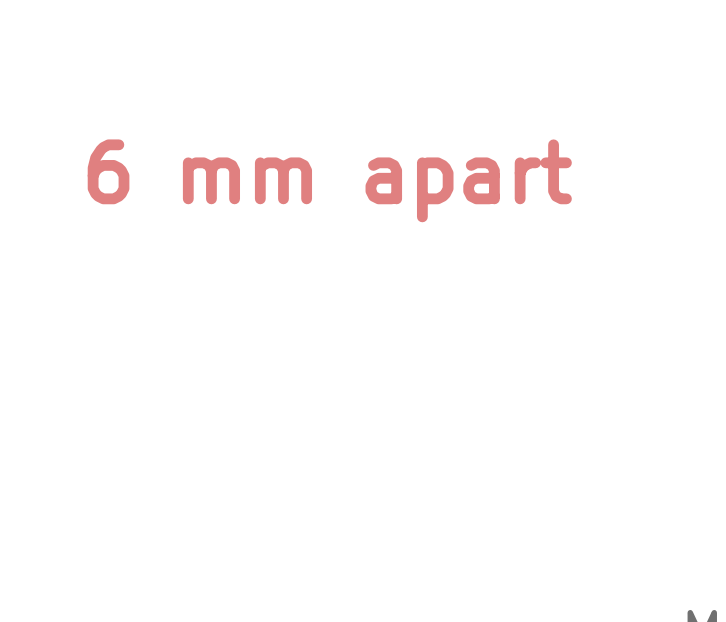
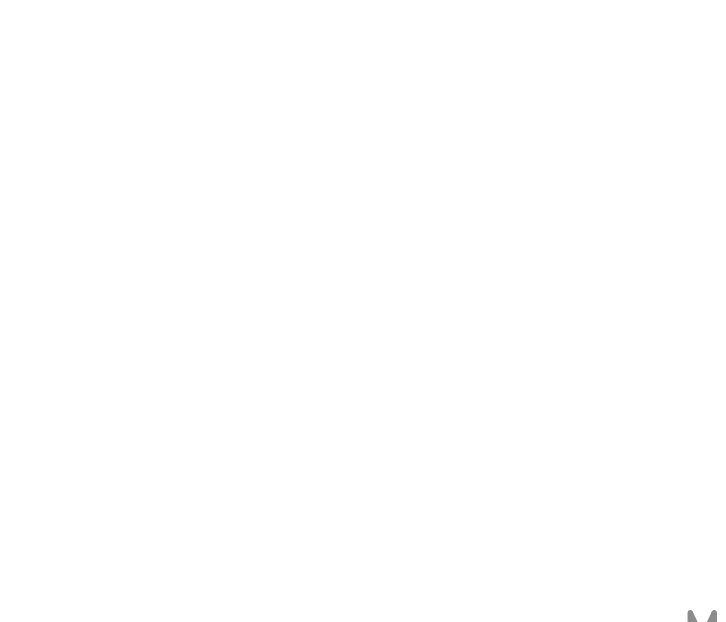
text: 6 mm apart (329, 180) -> none

